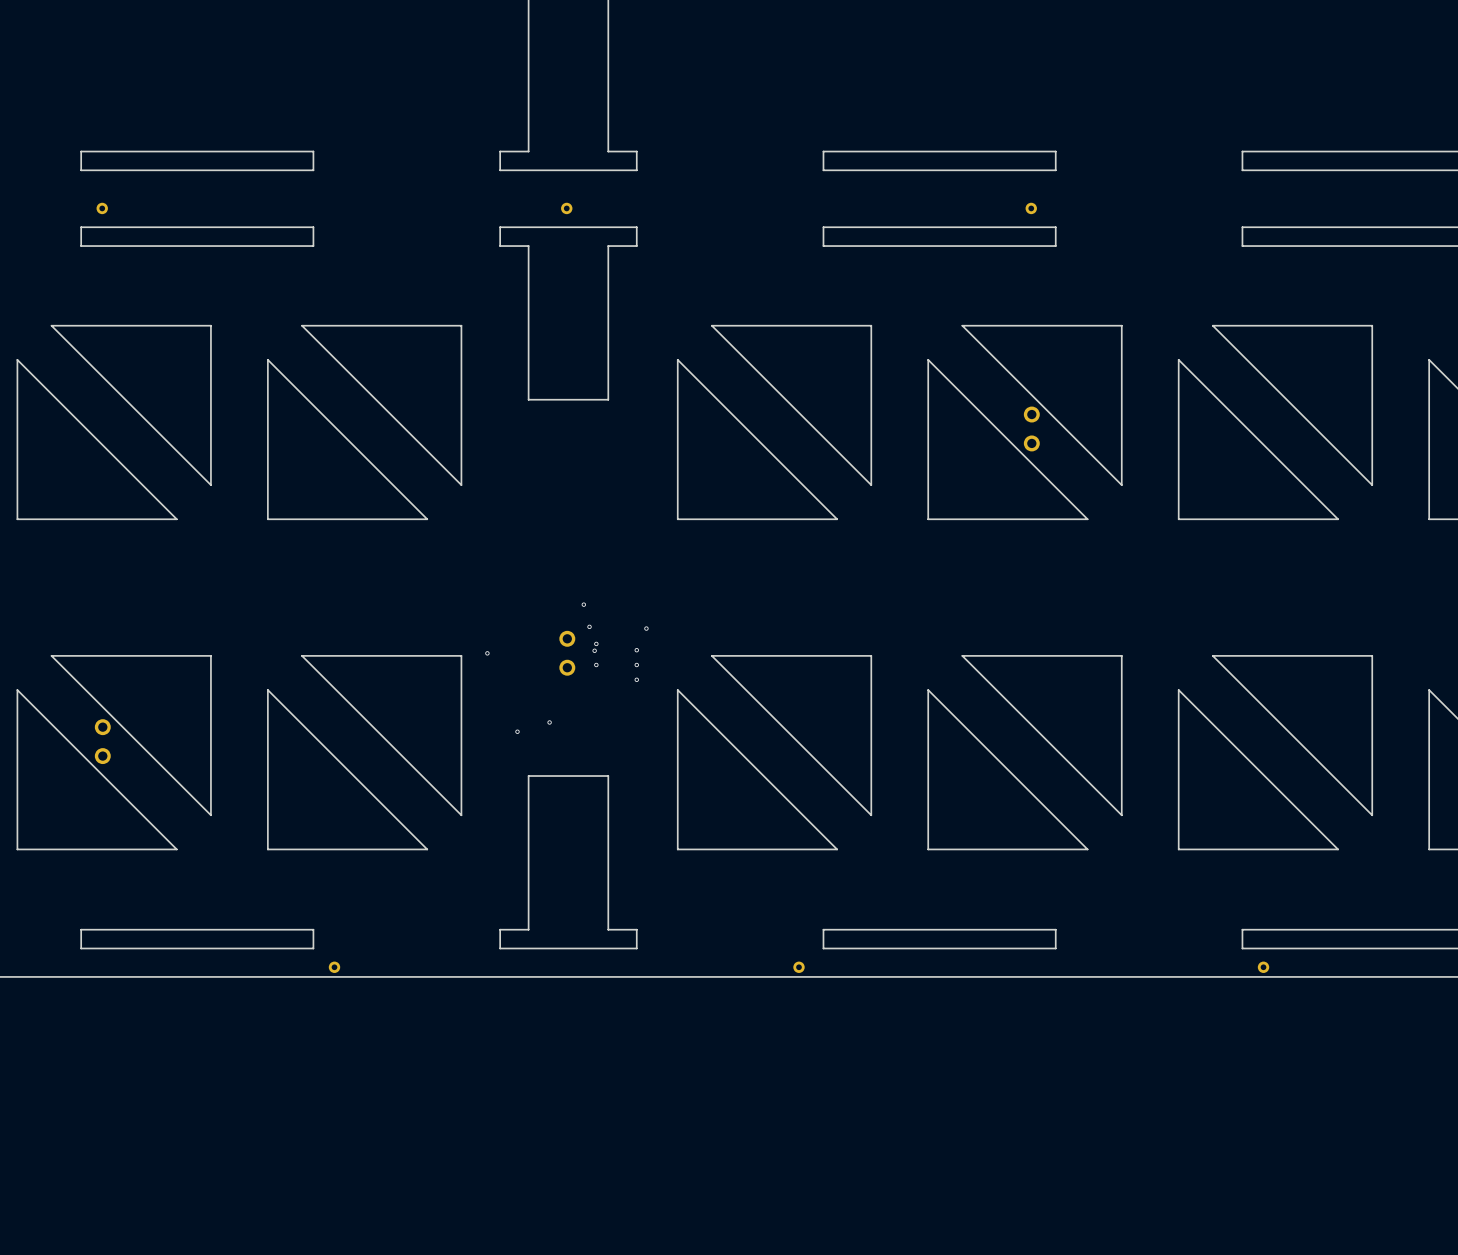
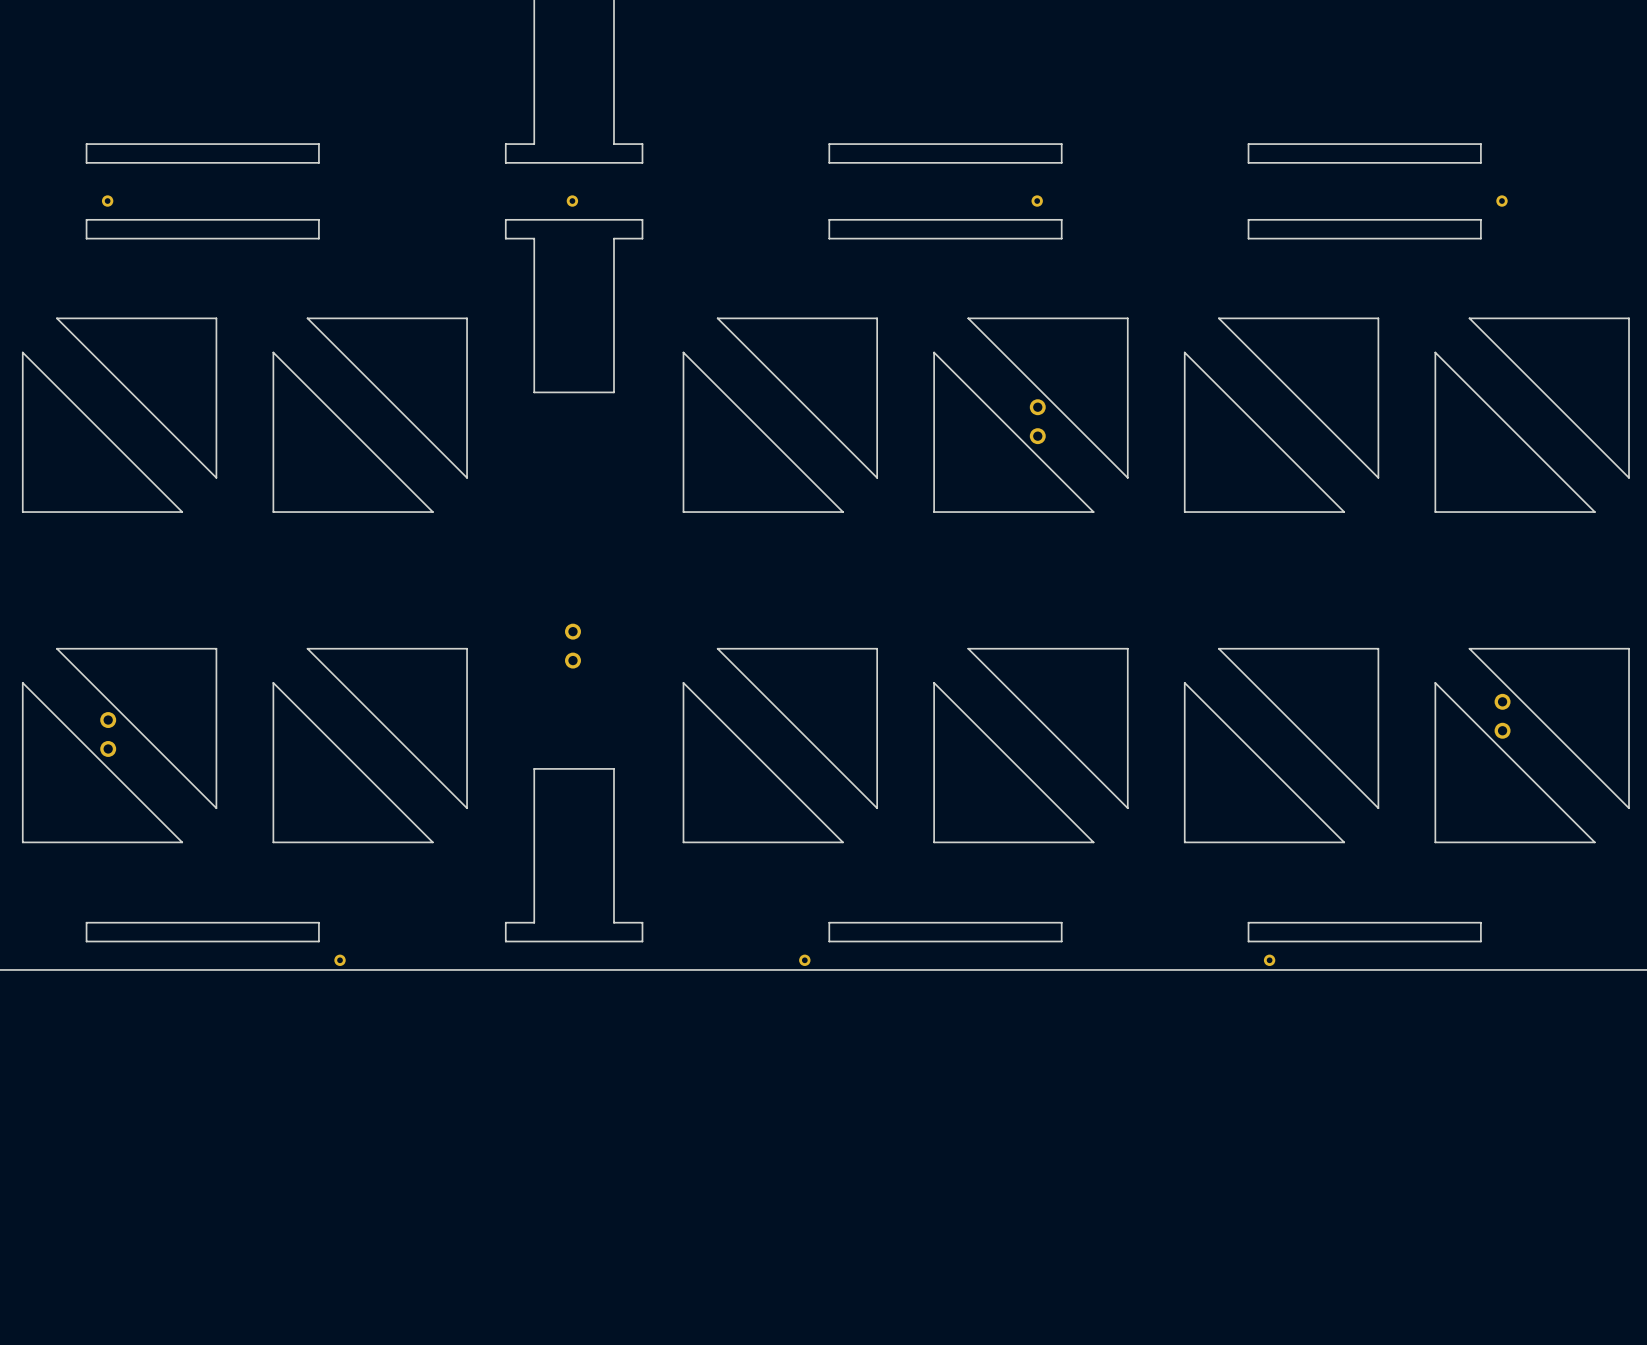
via: (583, 604) -> none
via: (589, 626) -> none
via: (646, 628) -> none
via: (596, 643) -> none
via: (594, 650) -> none
via: (636, 650) -> none
via: (487, 653) -> none
via: (596, 665) -> none
via: (636, 665) -> none
via: (636, 679) -> none
via: (549, 722) -> none
via: (517, 731) -> none

